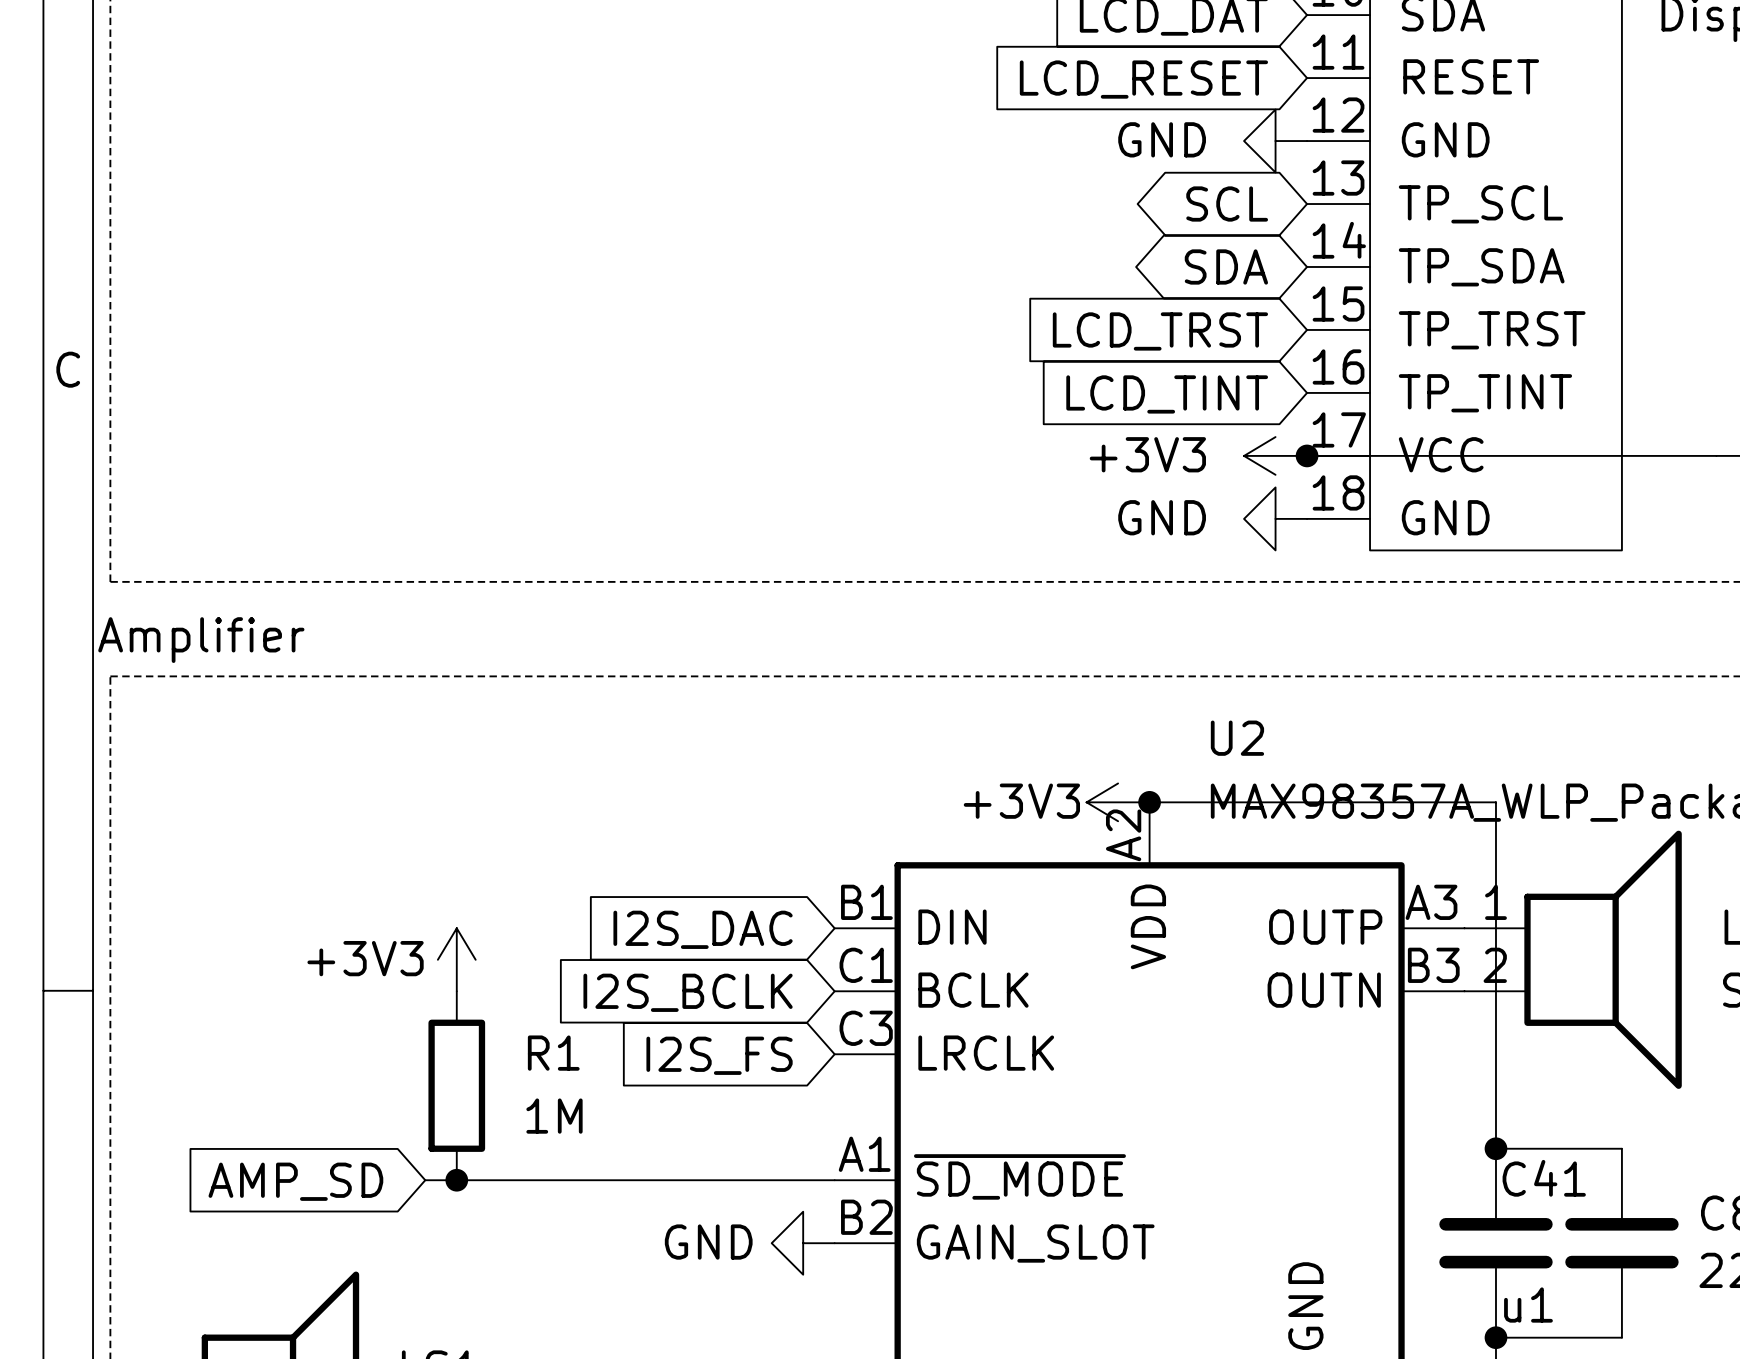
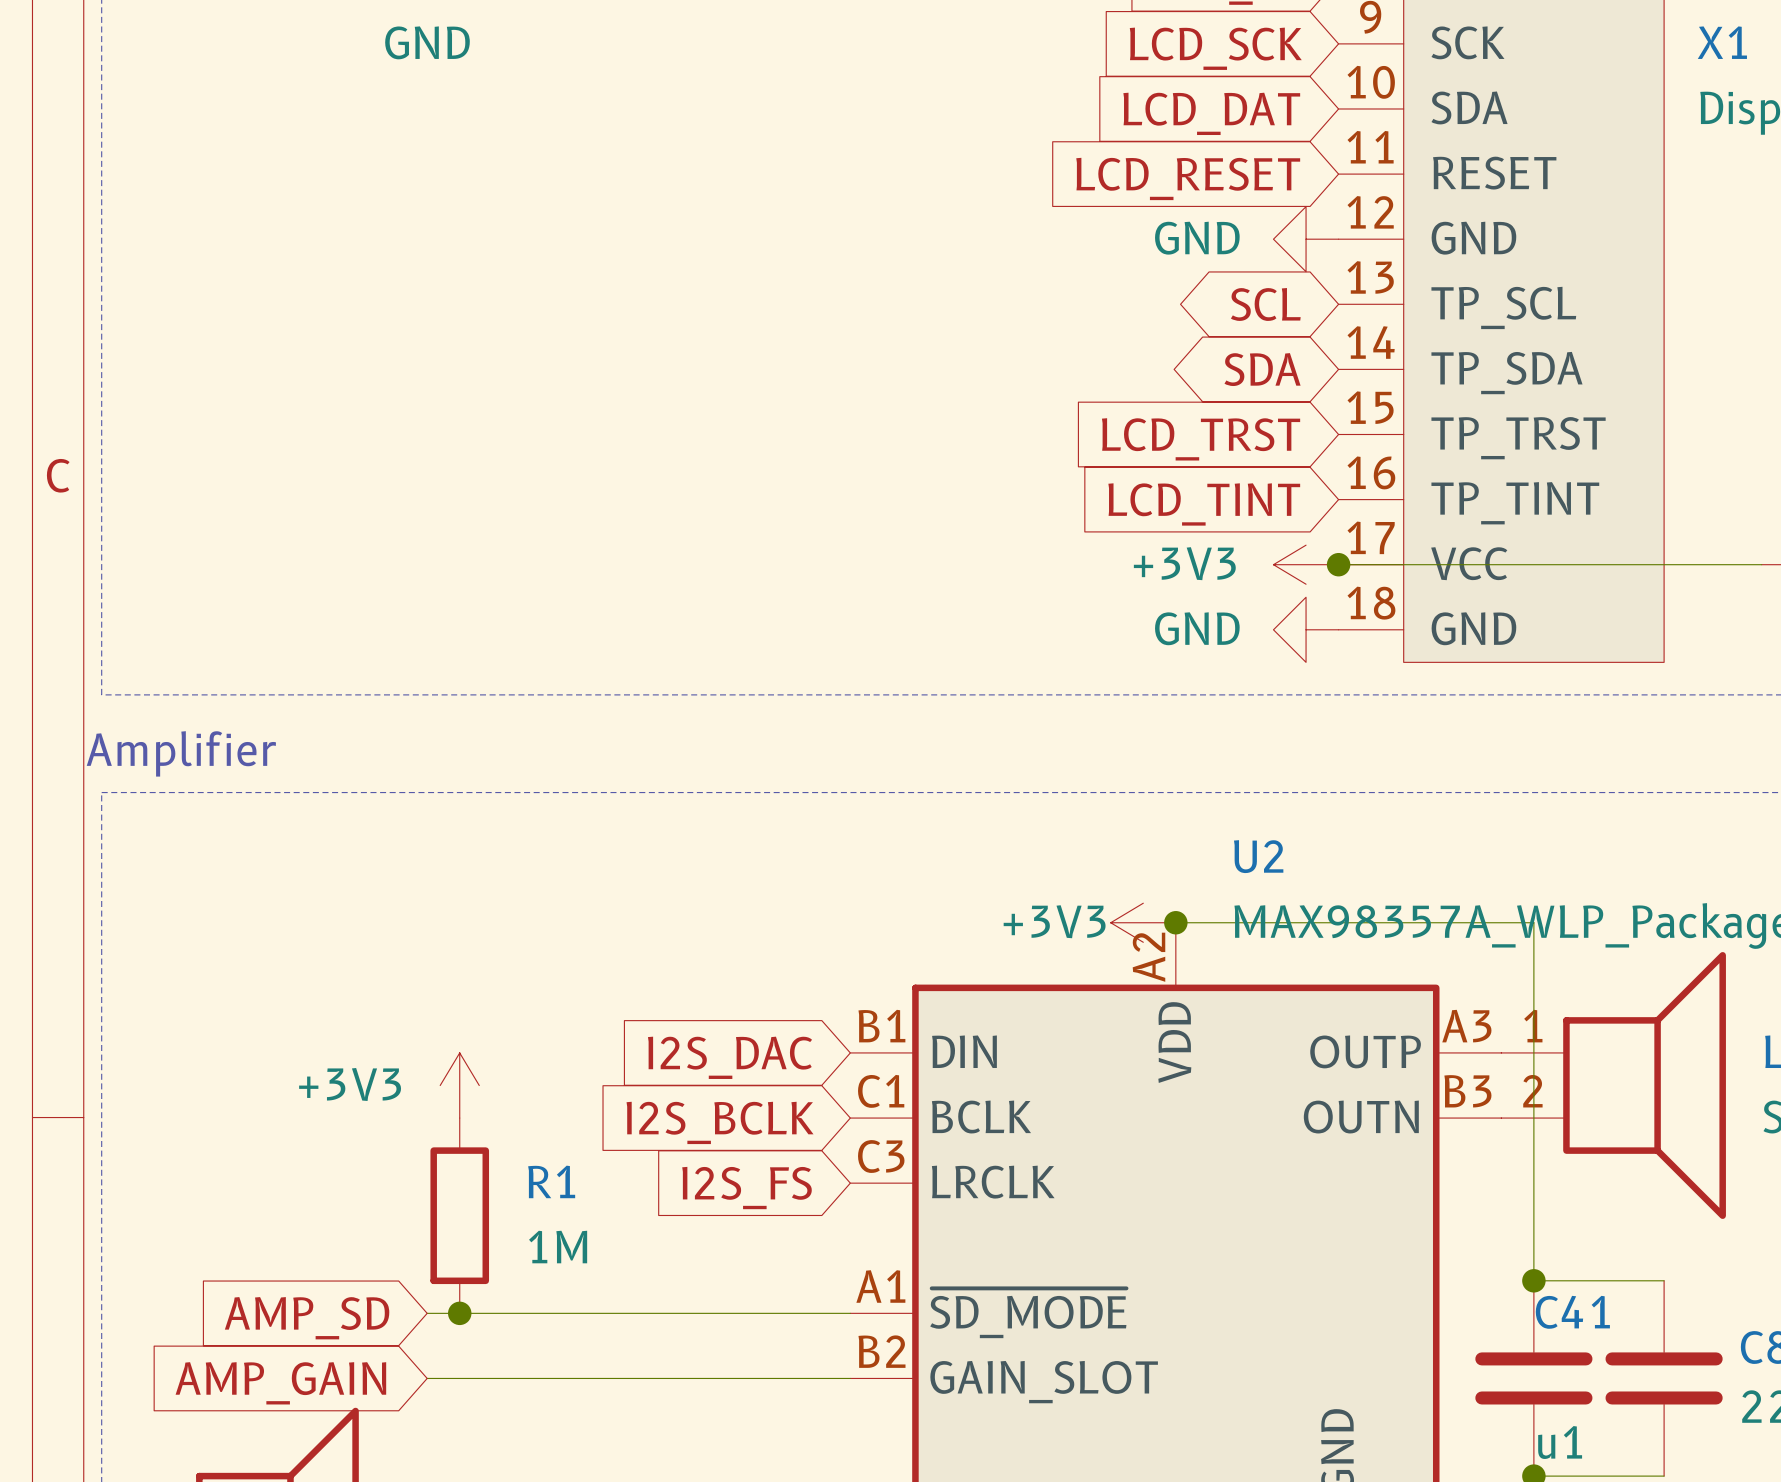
wire: none -> (427, 1378) (850, 1378)
power symbol: GND (803, 1243) -> none
global label: none -> AMP_GAIN (280, 1383)

